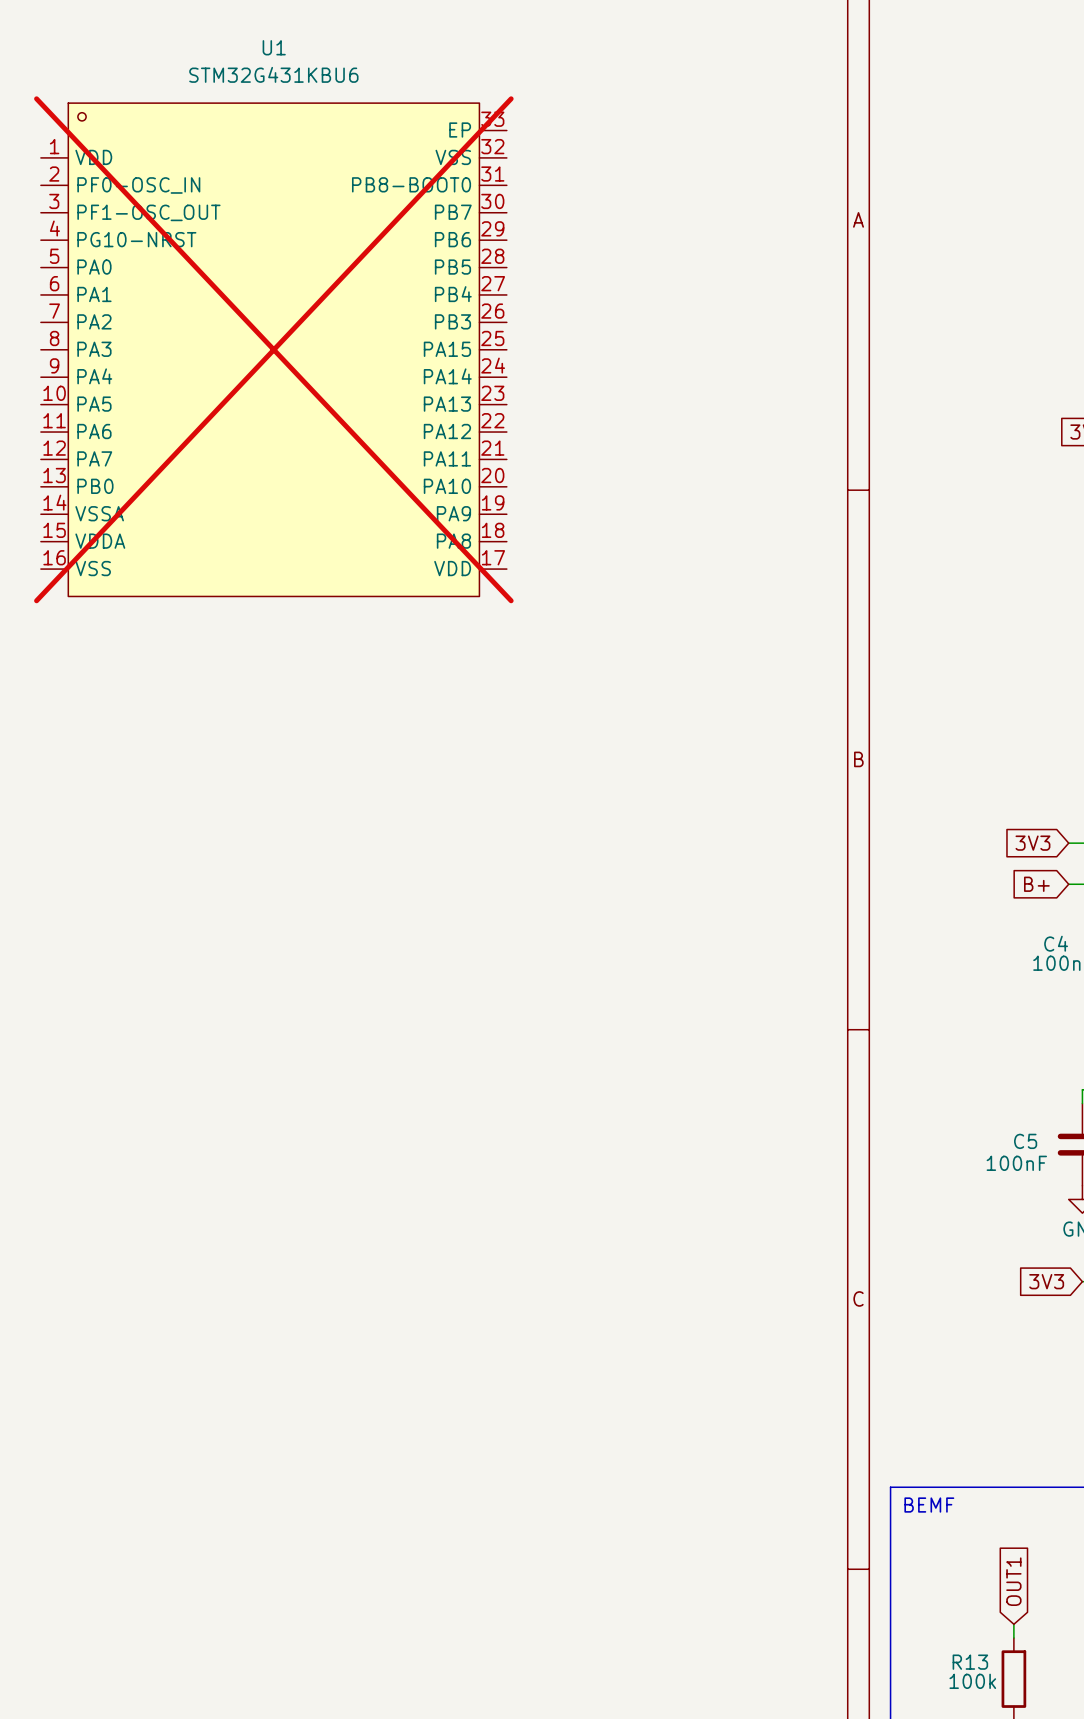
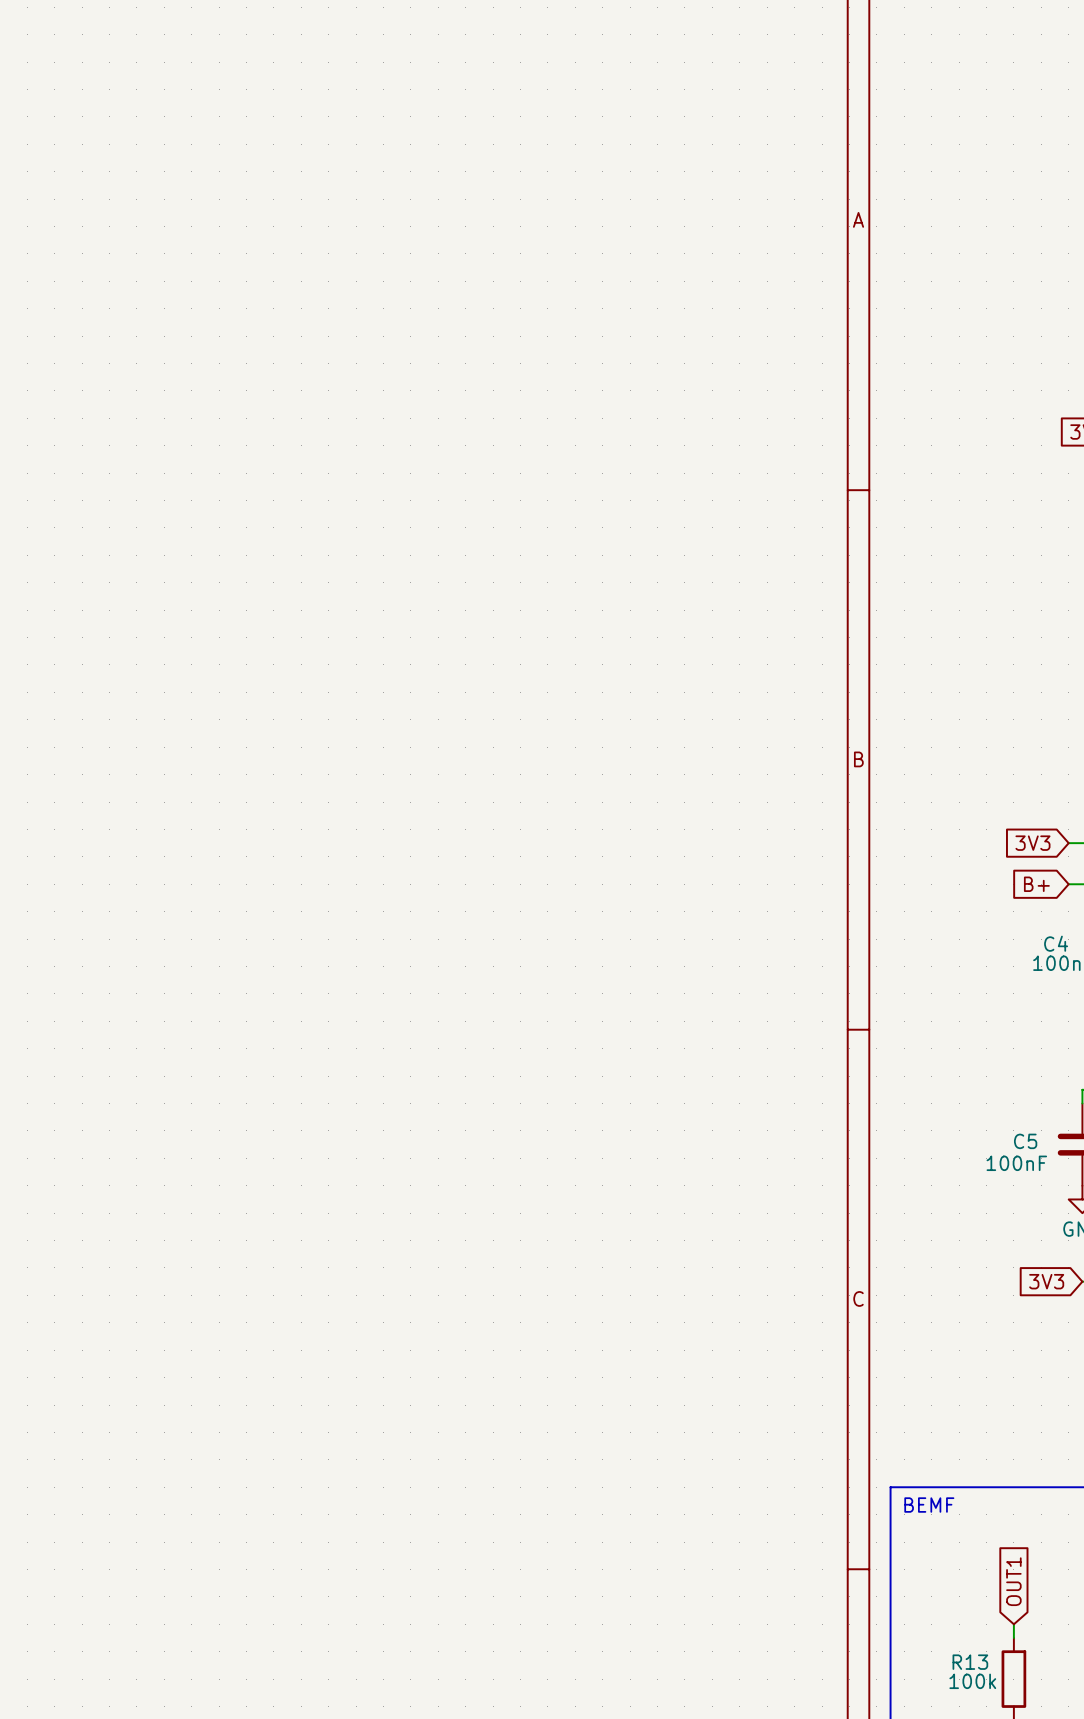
U1: STM32G431KBU6 (273, 349) -> none

